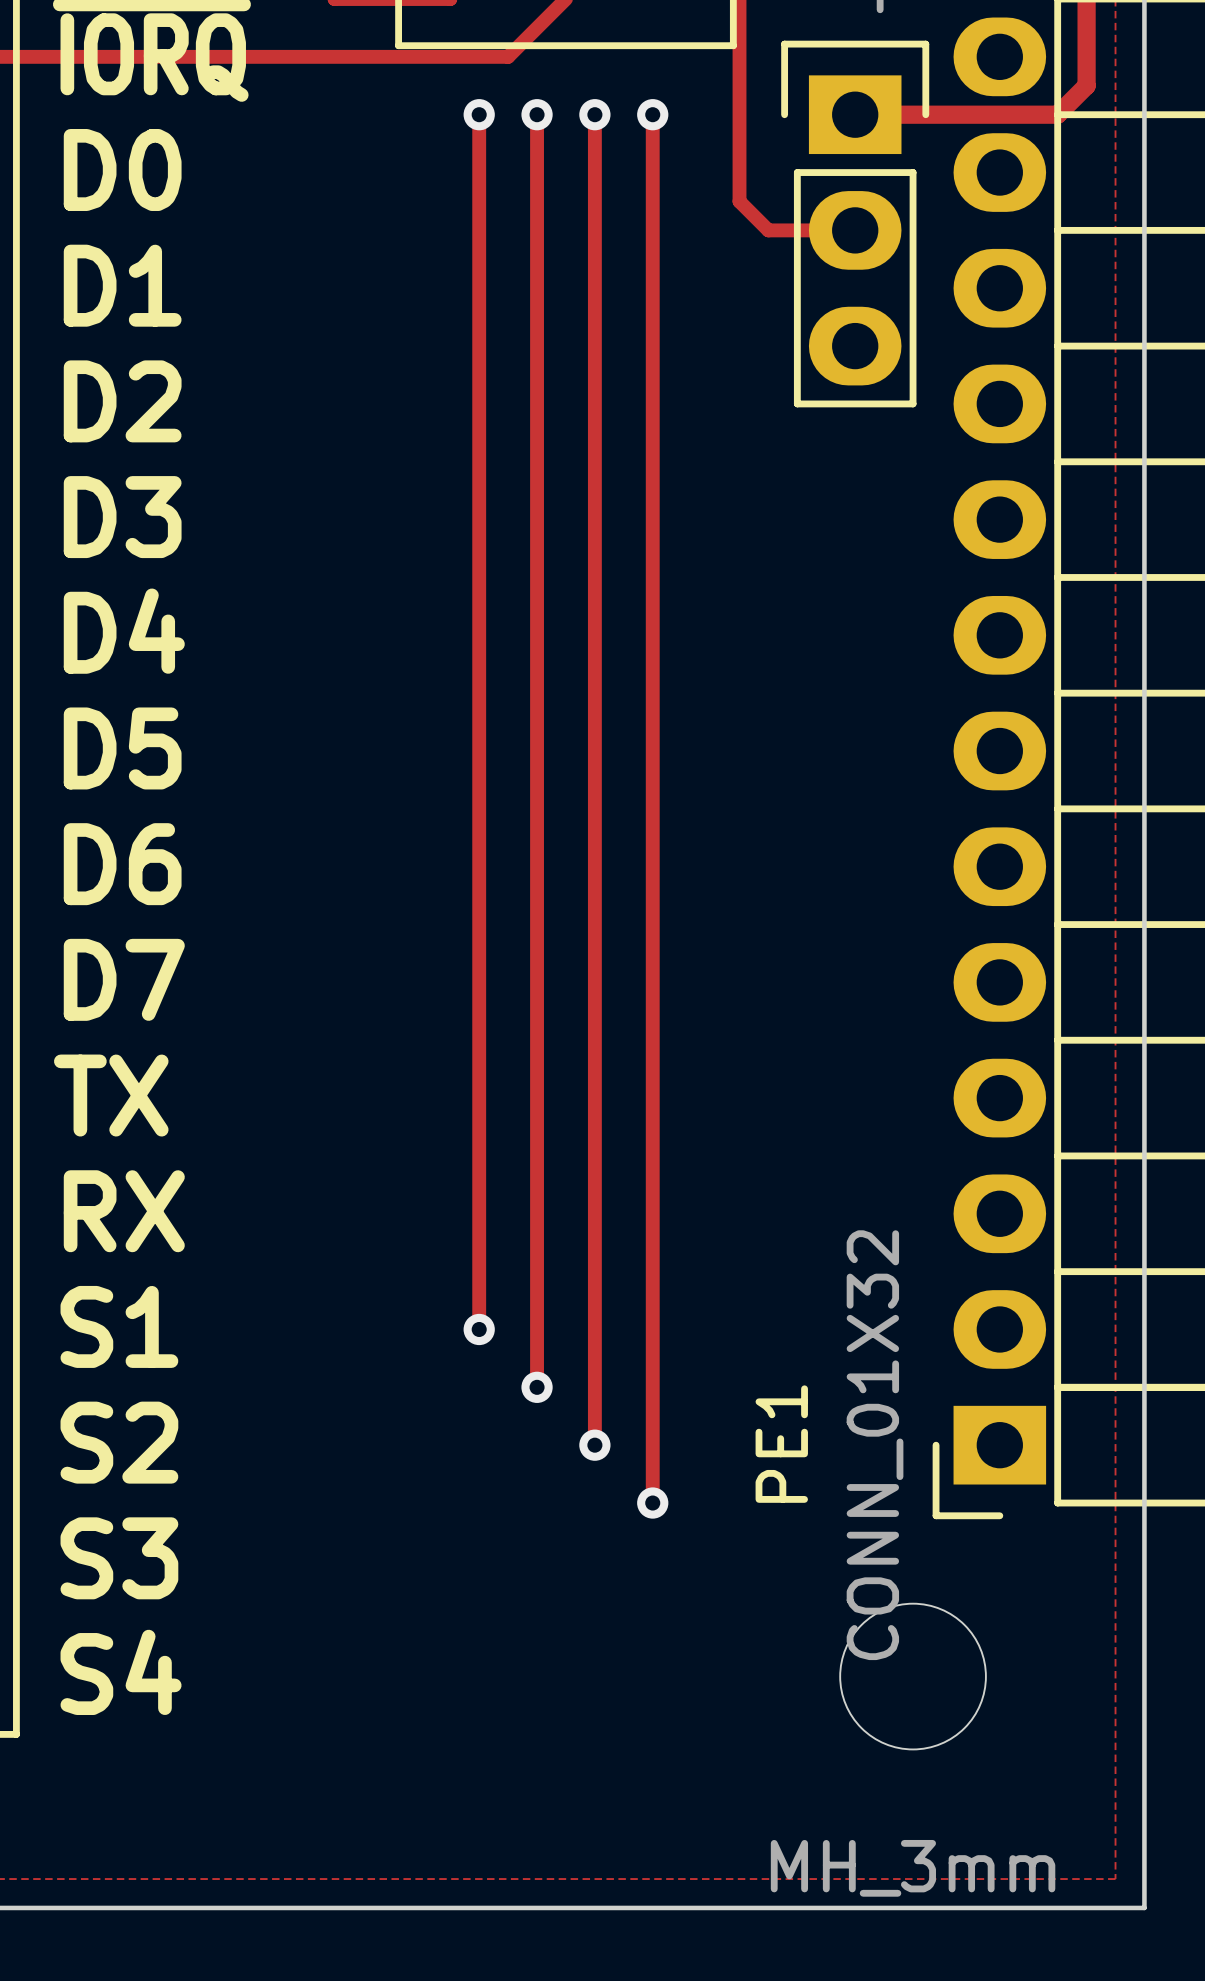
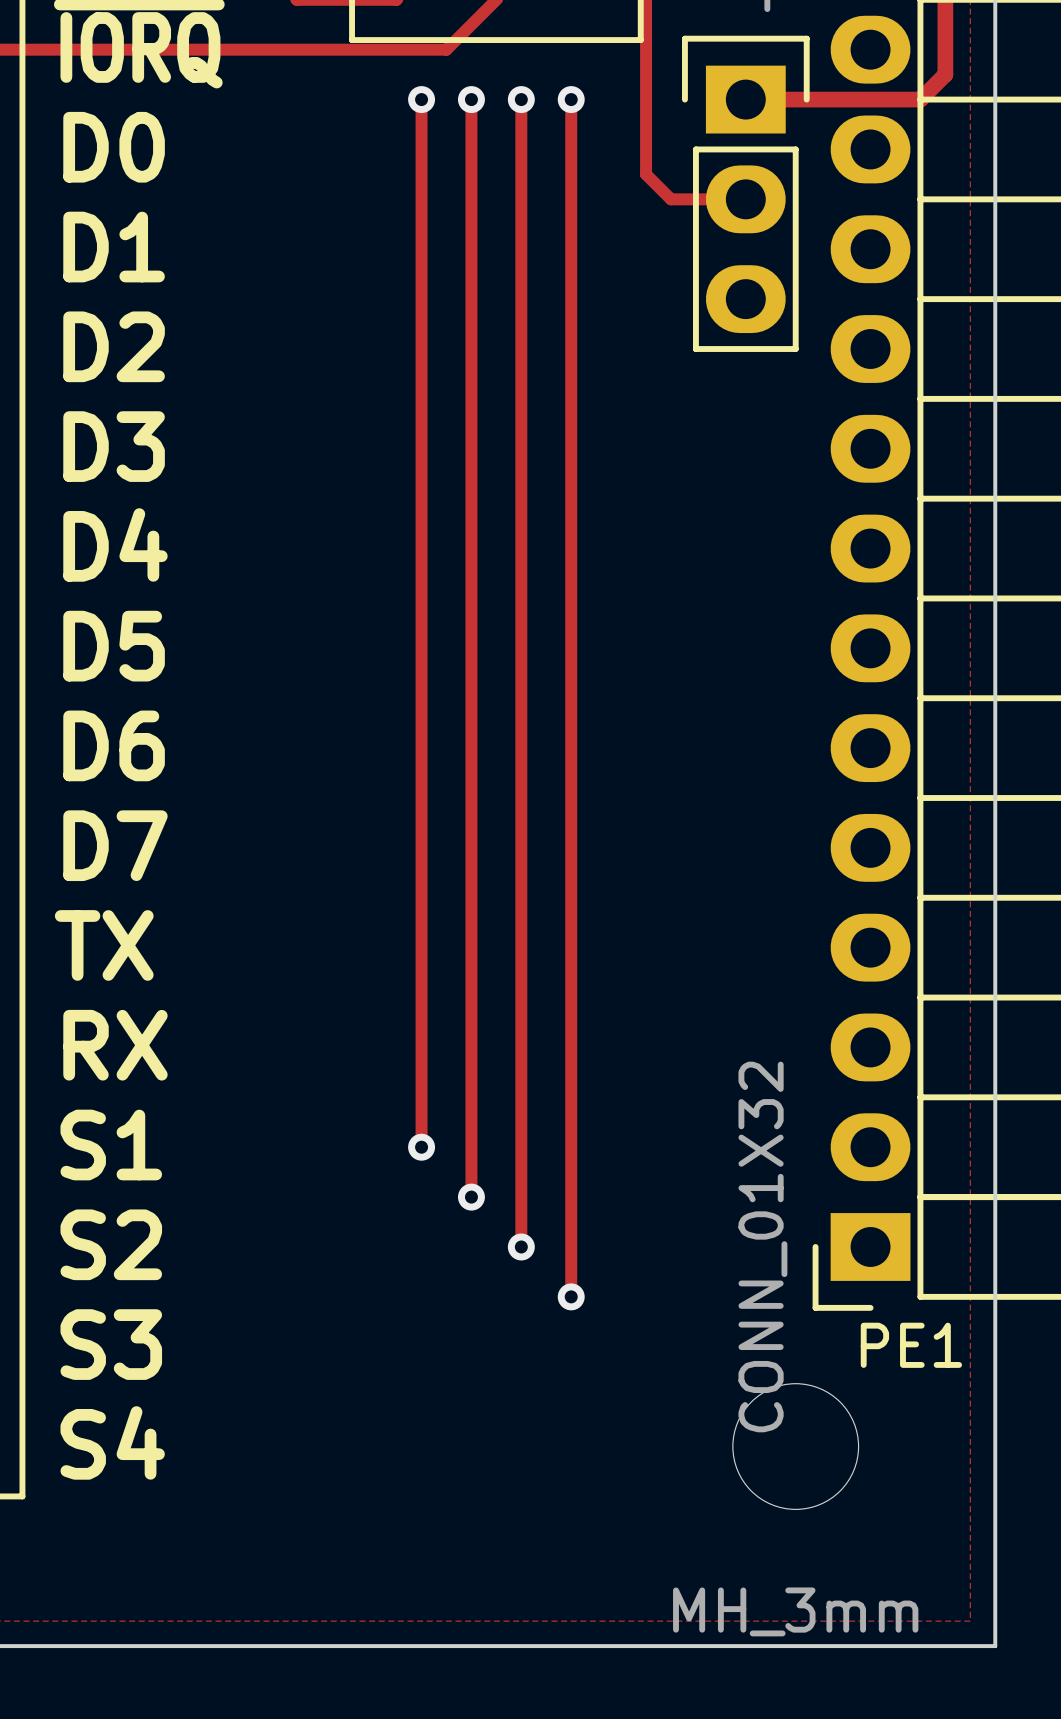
PE1 name rotation: 0° (781, 1444) -> 90° clockwise (911, 1345)
PE1 name position: PE1 (781, 1444) -> PE1 (911, 1345)

